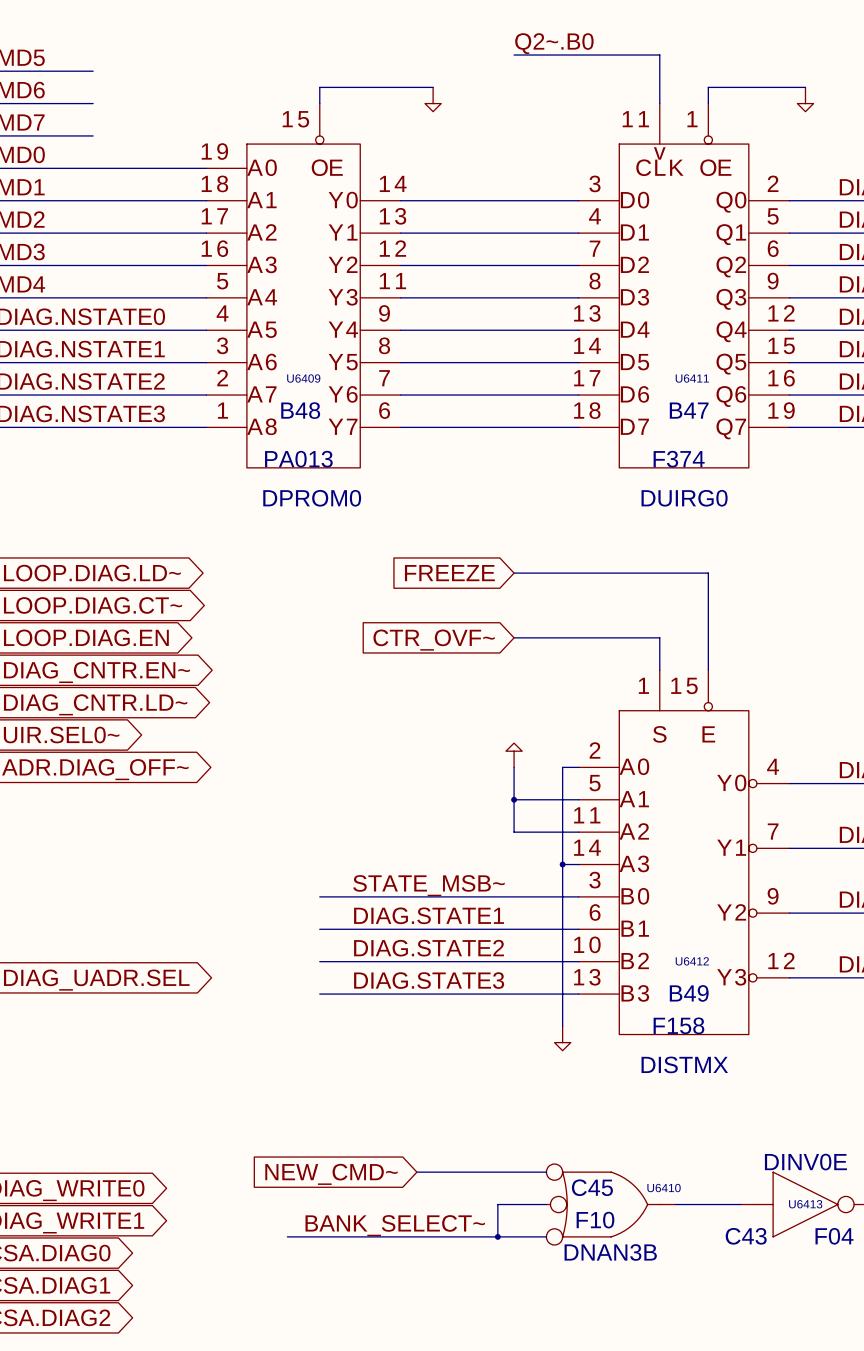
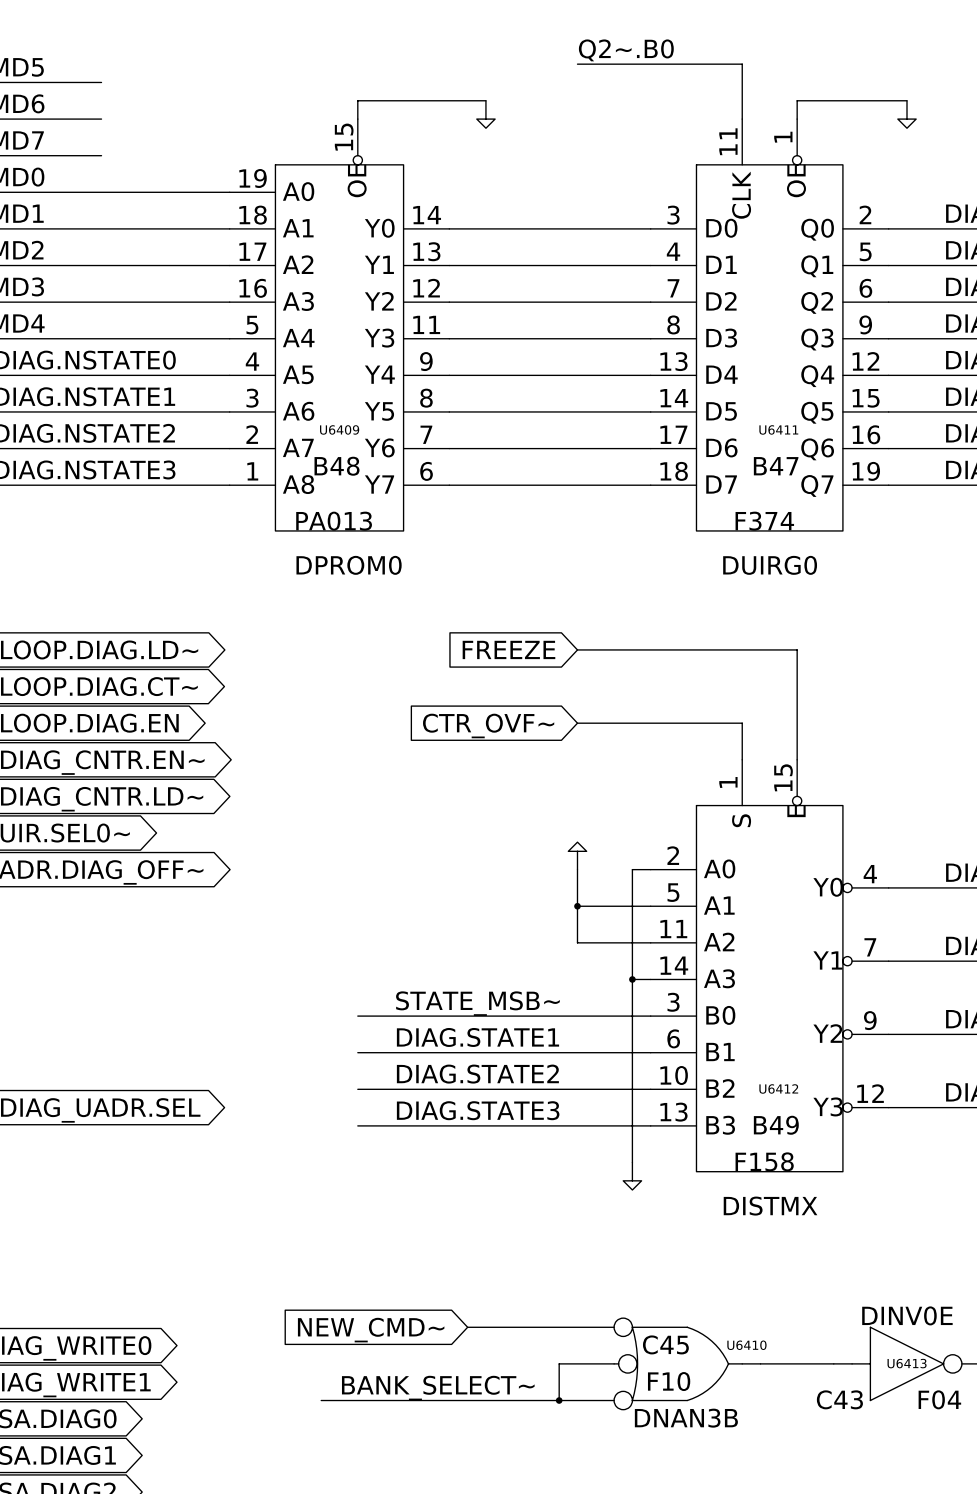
U6409 symbol: [206, 103, 401, 468] -> [229, 119, 450, 531]
U6411 symbol: [578, 103, 790, 468] -> [650, 119, 889, 531]
U6412 symbol: [578, 670, 790, 1035] -> [650, 759, 889, 1172]

